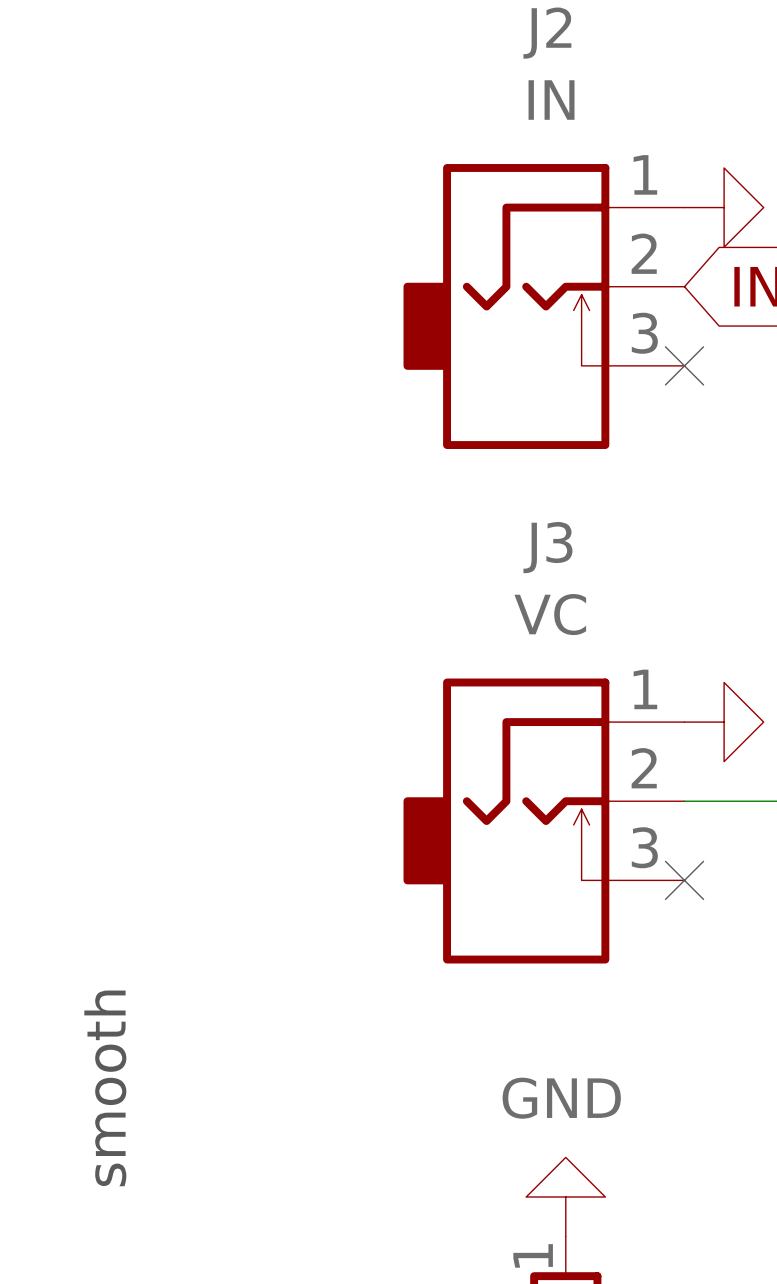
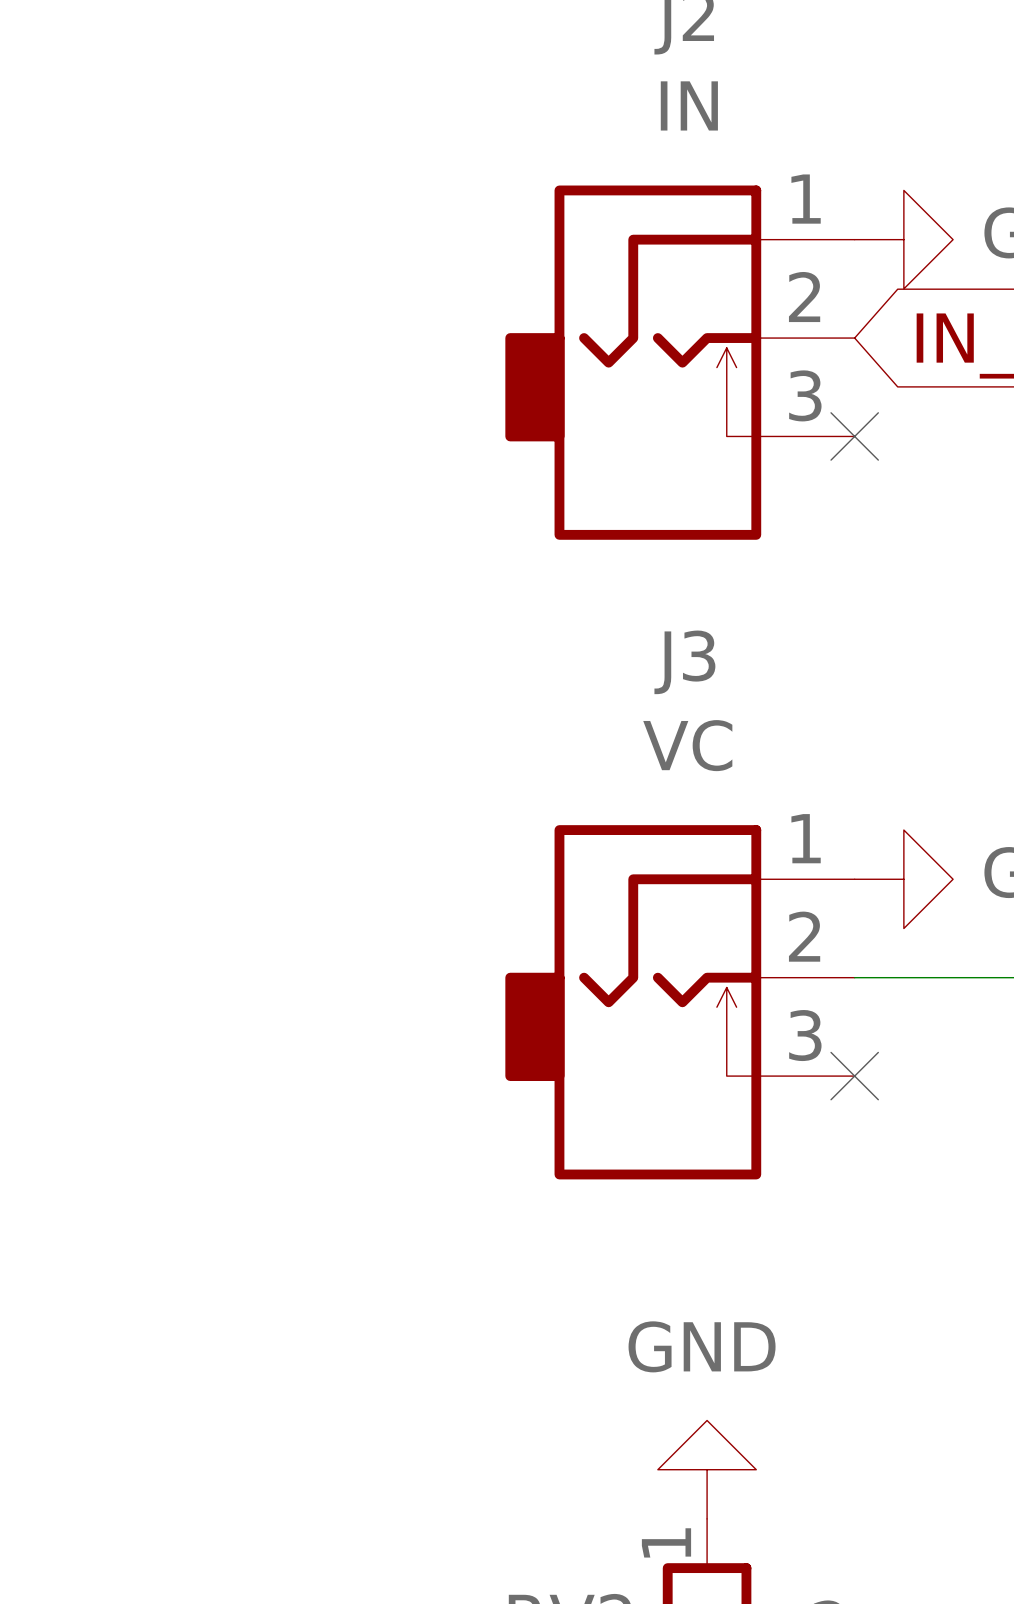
text: smooth (105, 1088) -> none

